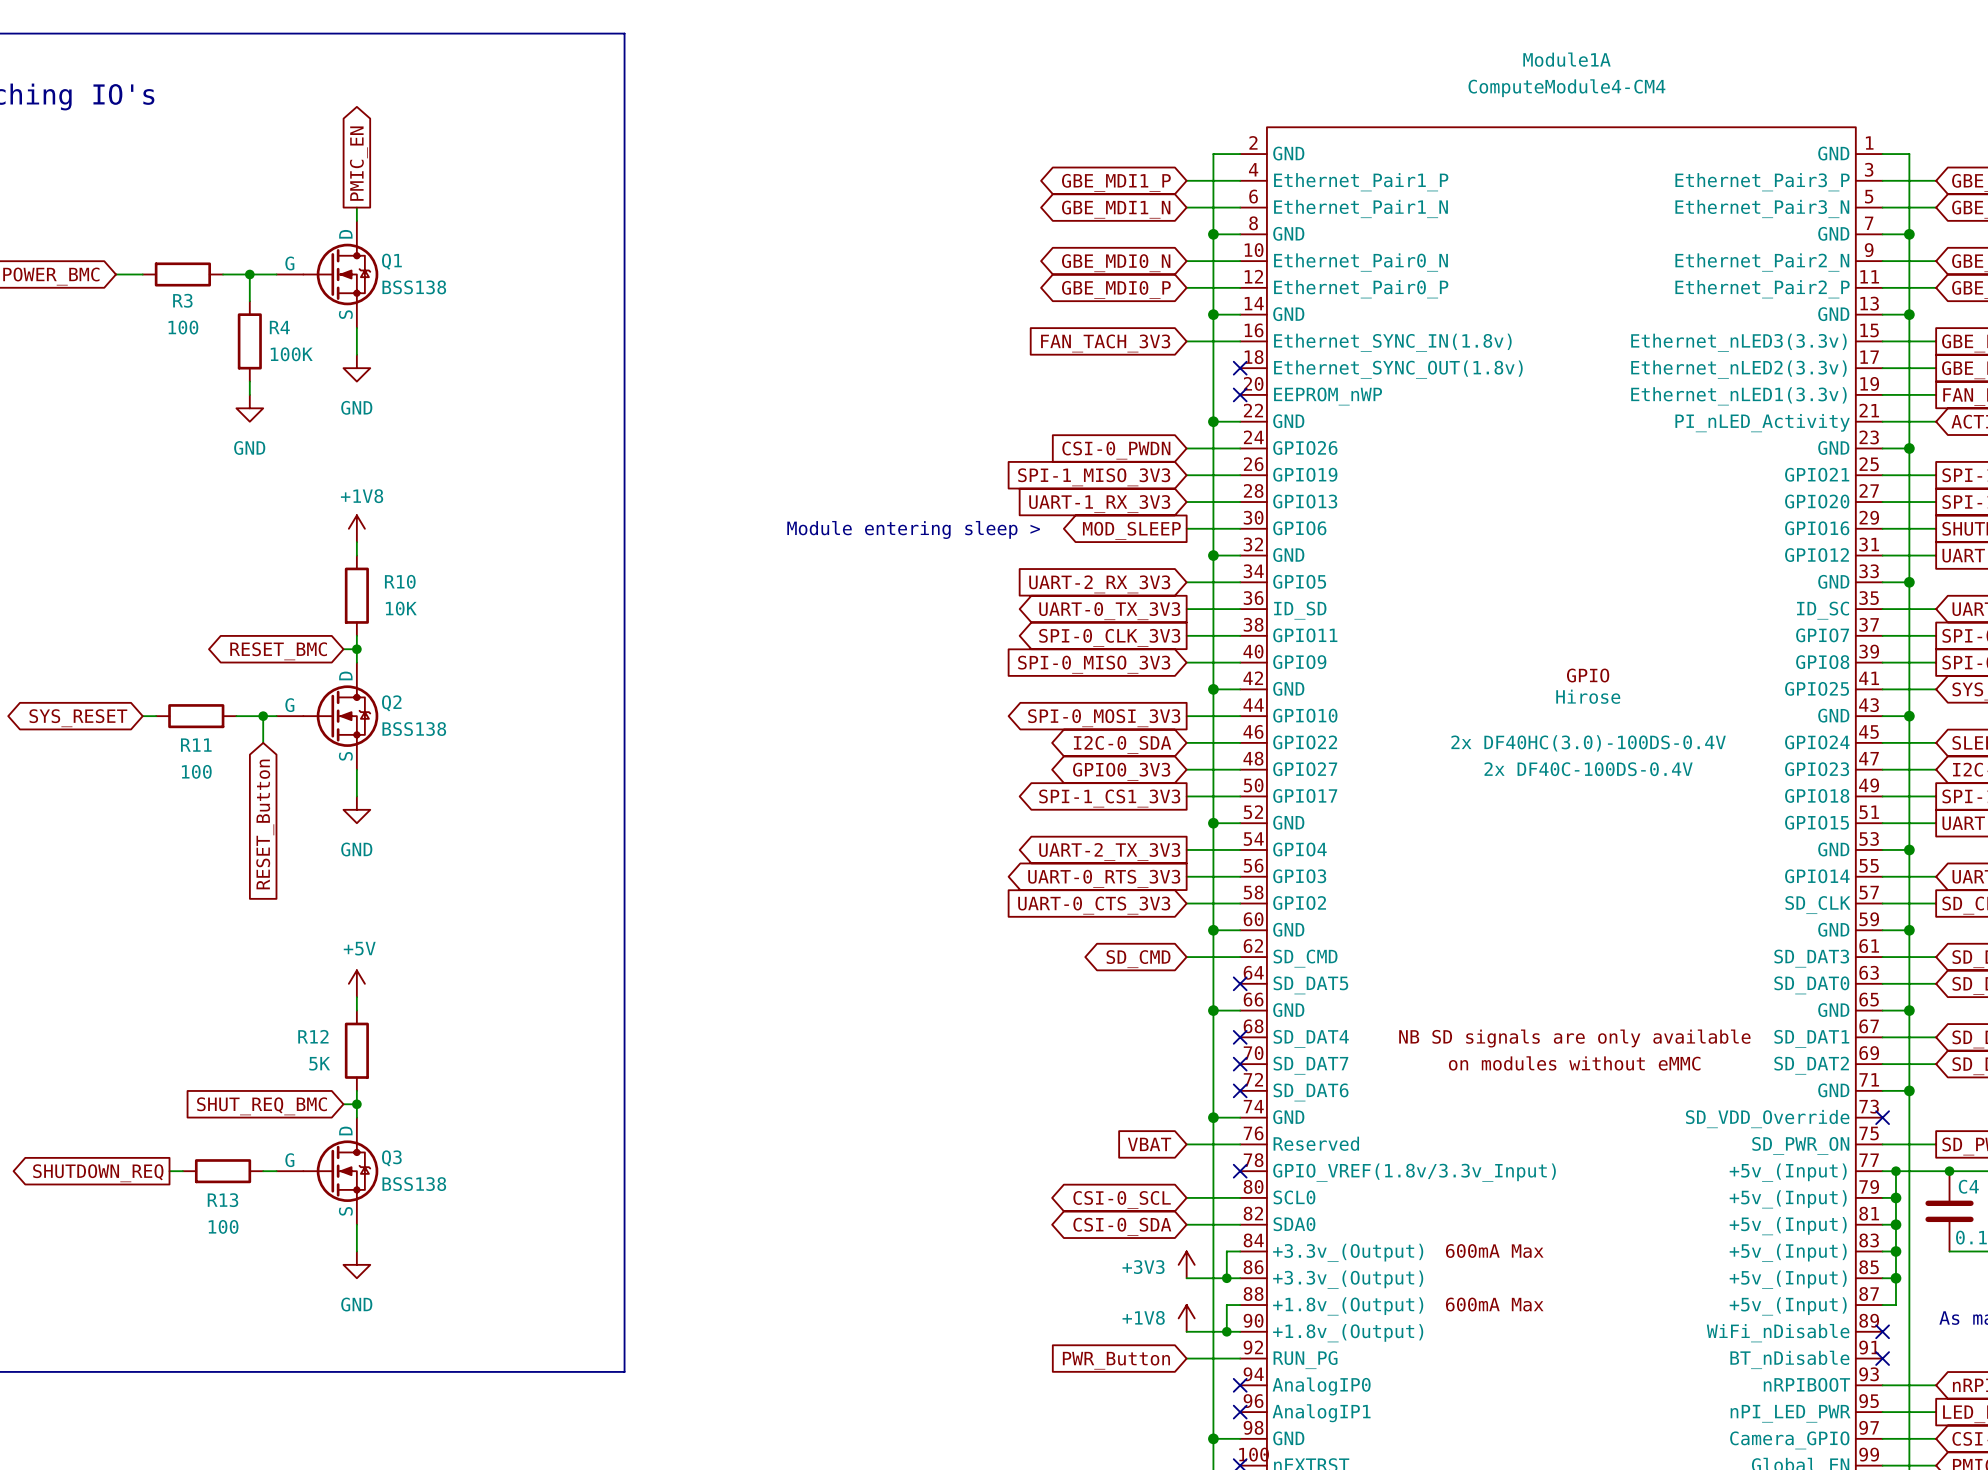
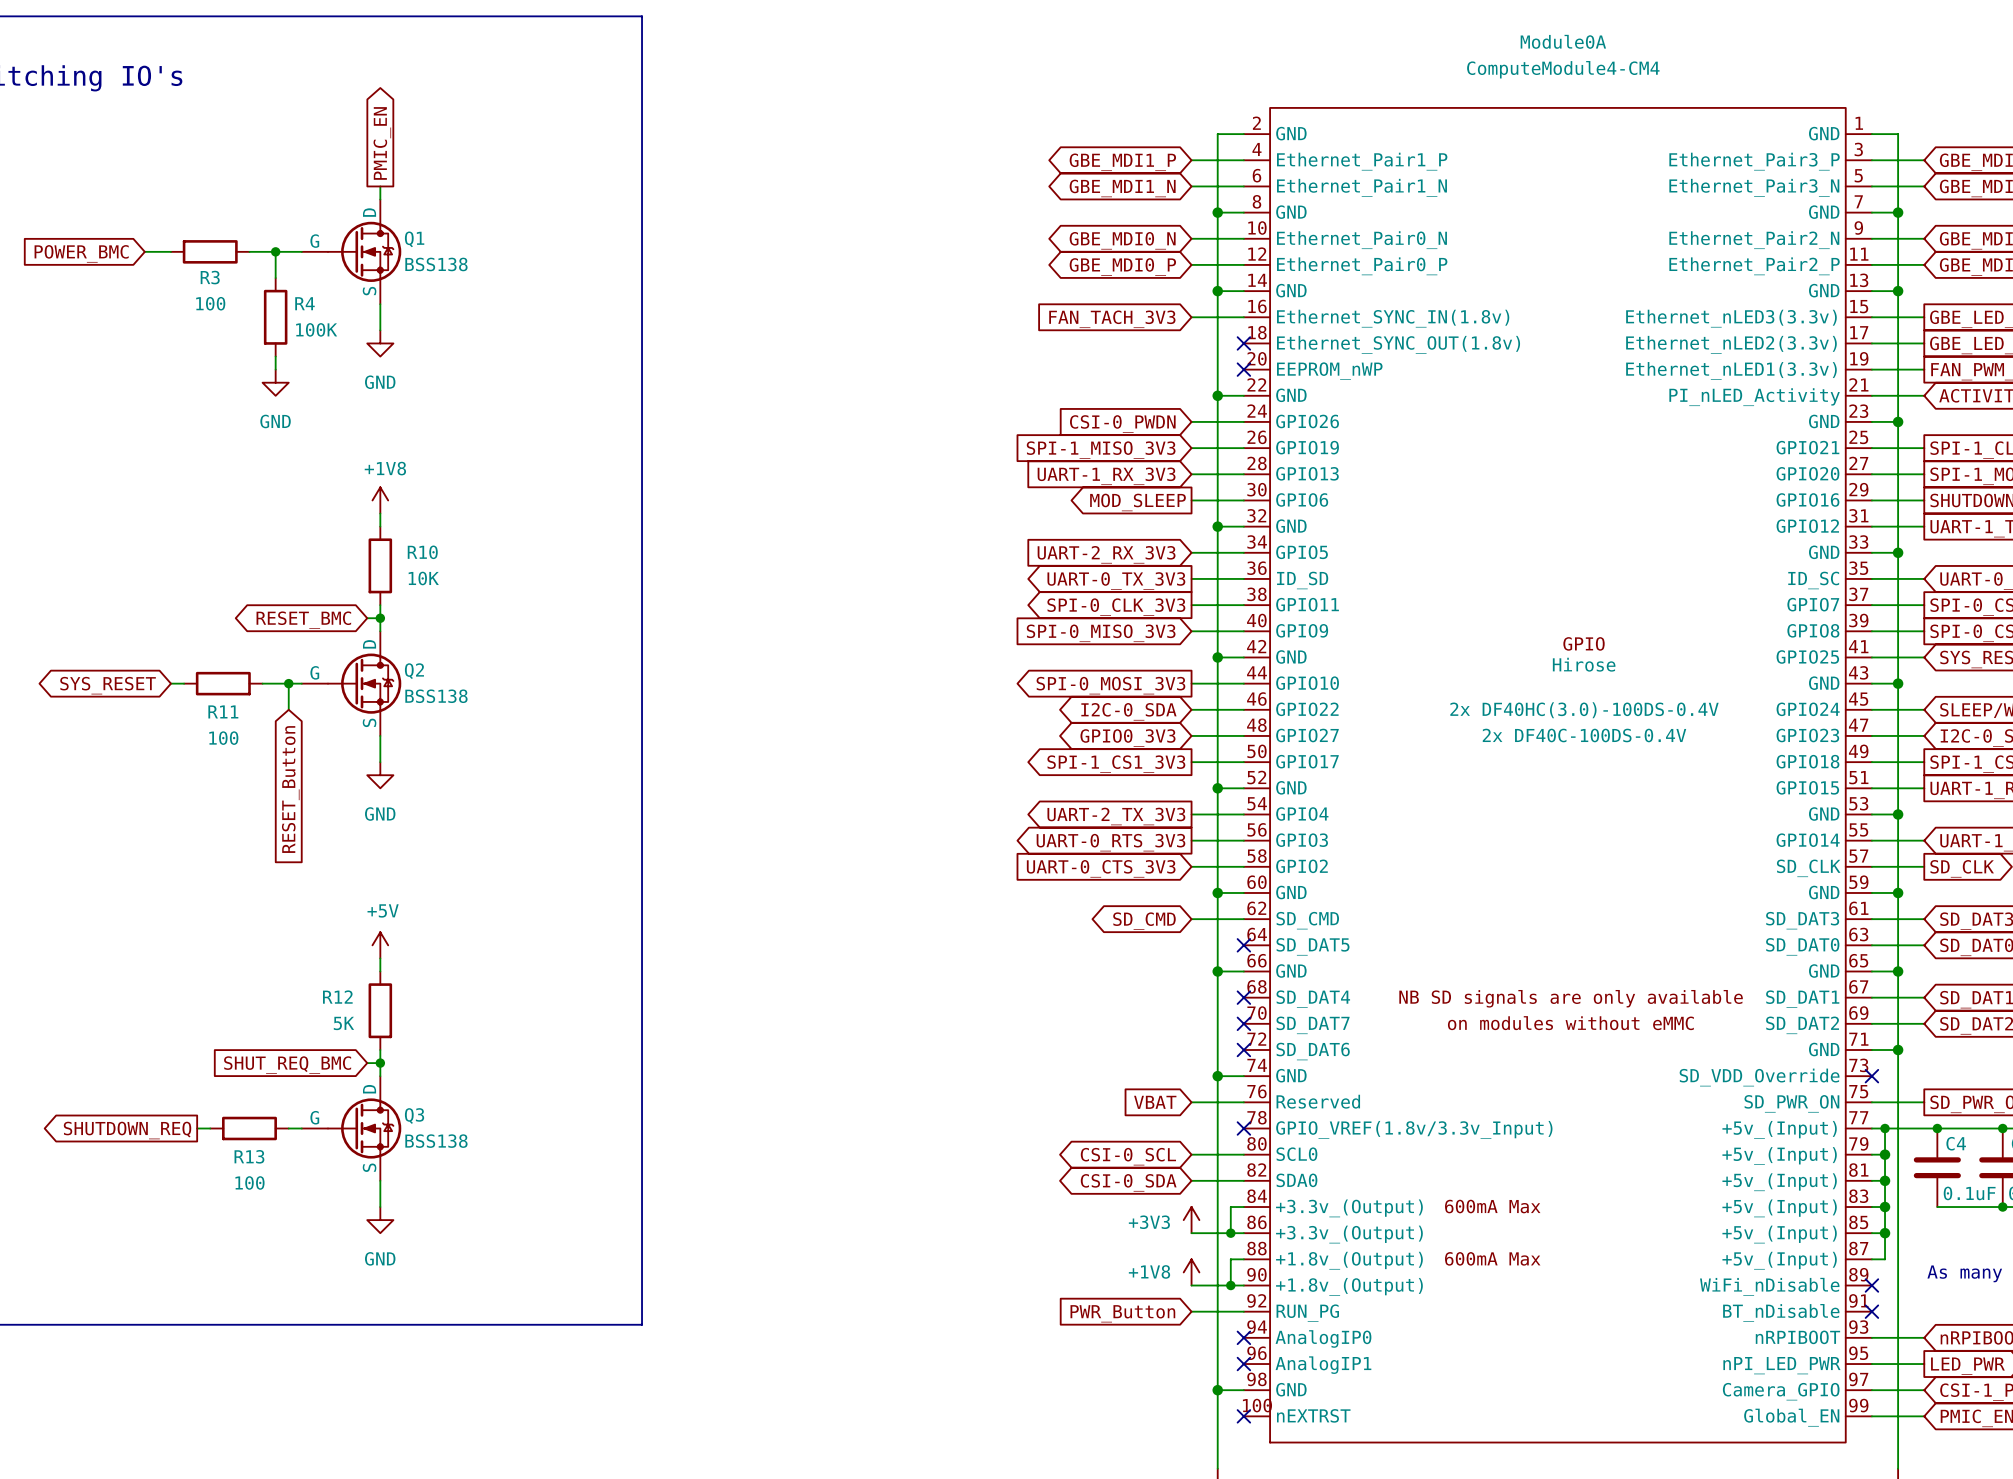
Module1A name: Module1A (1566, 59) -> Module0A (1563, 41)
text: Module entering sleep > (913, 529) -> none

